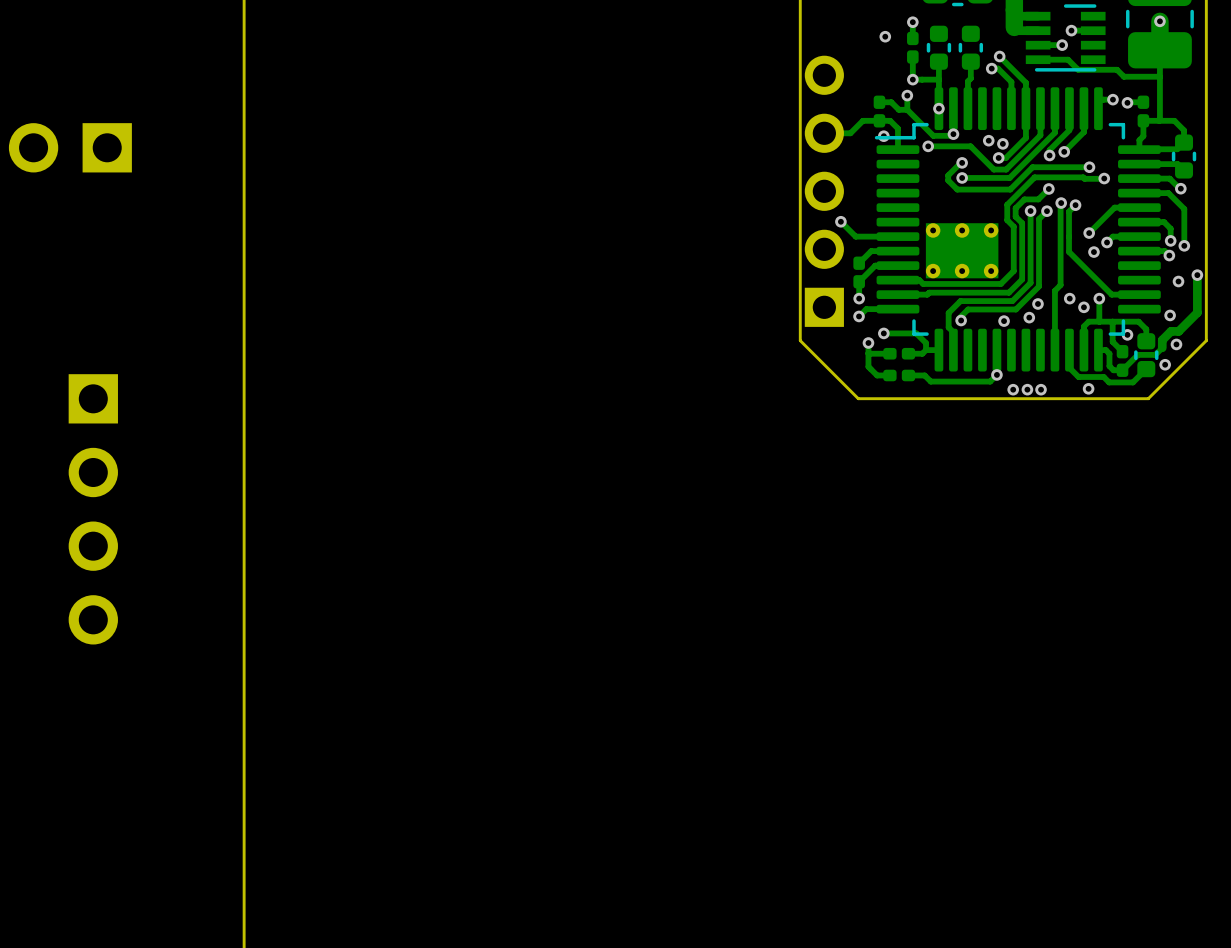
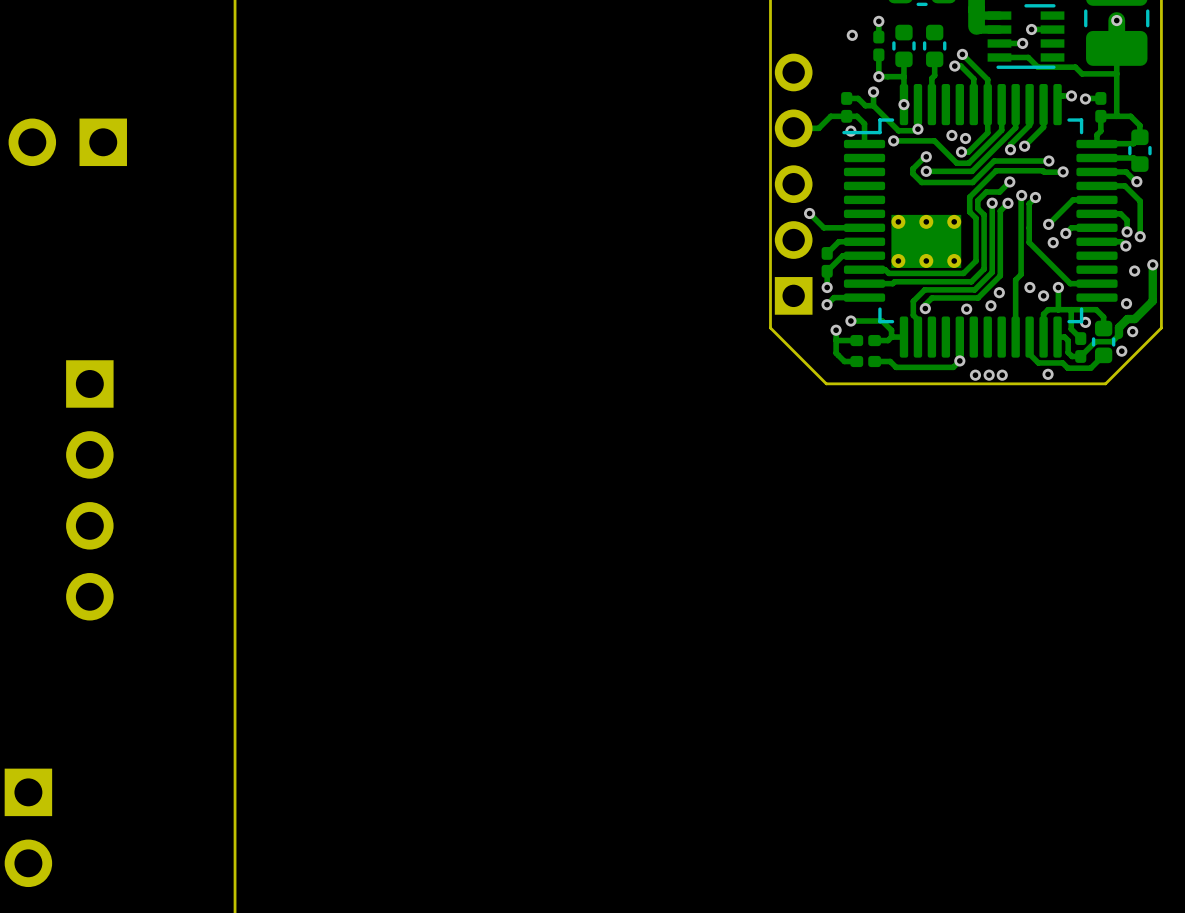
part: none -> (28, 827)

